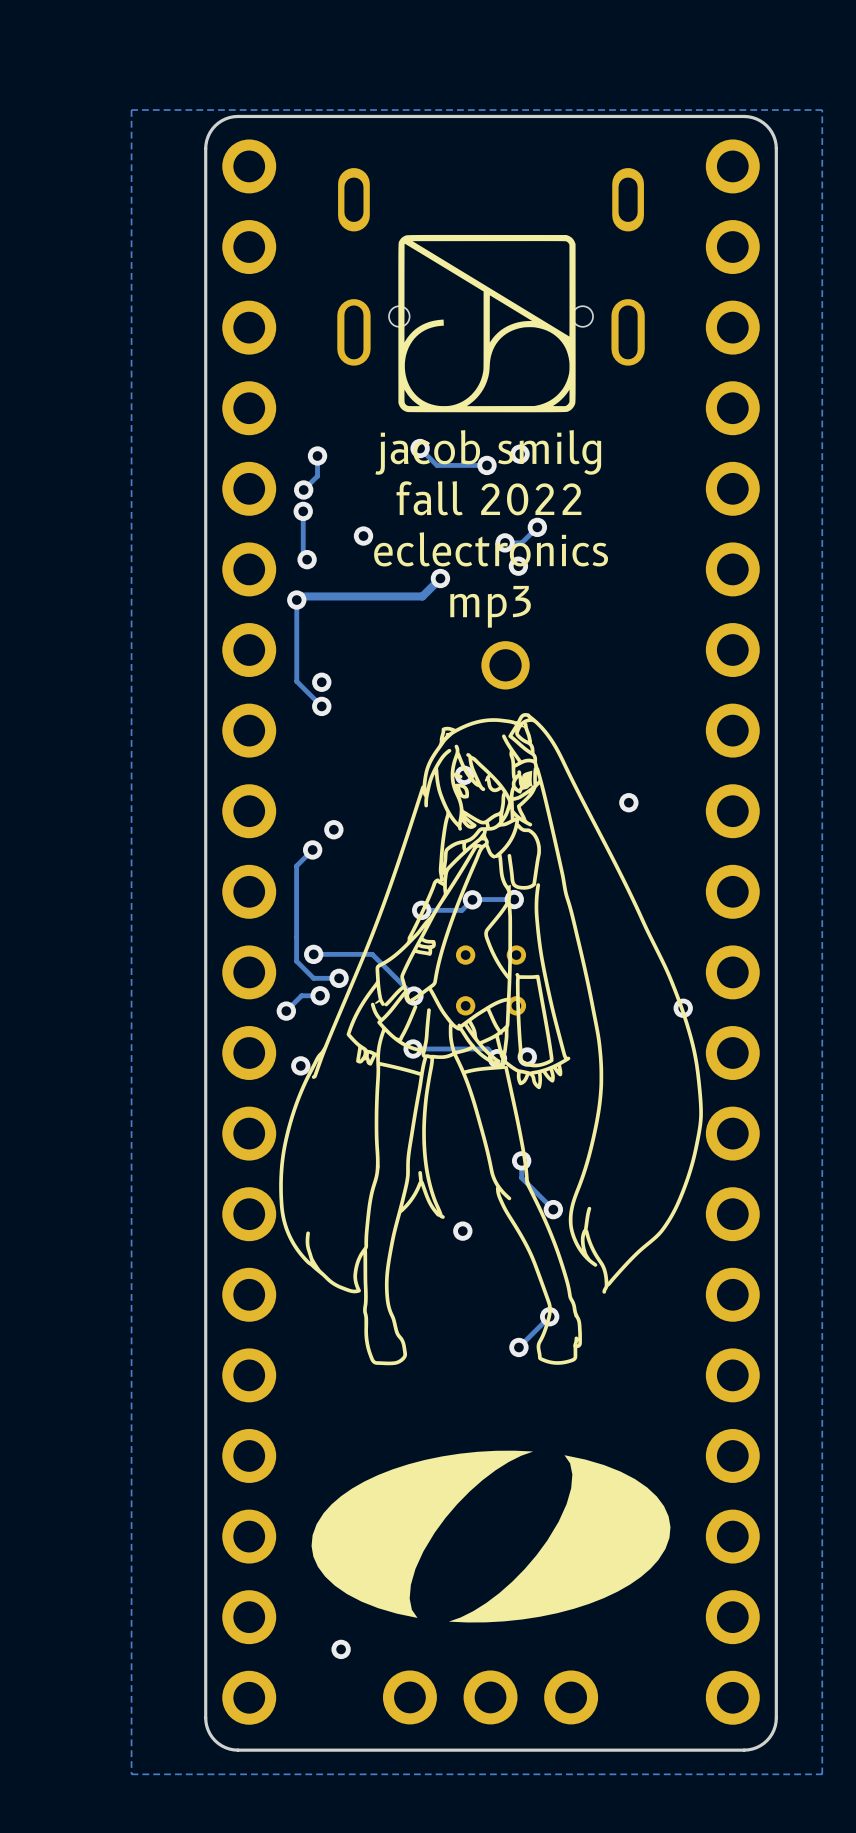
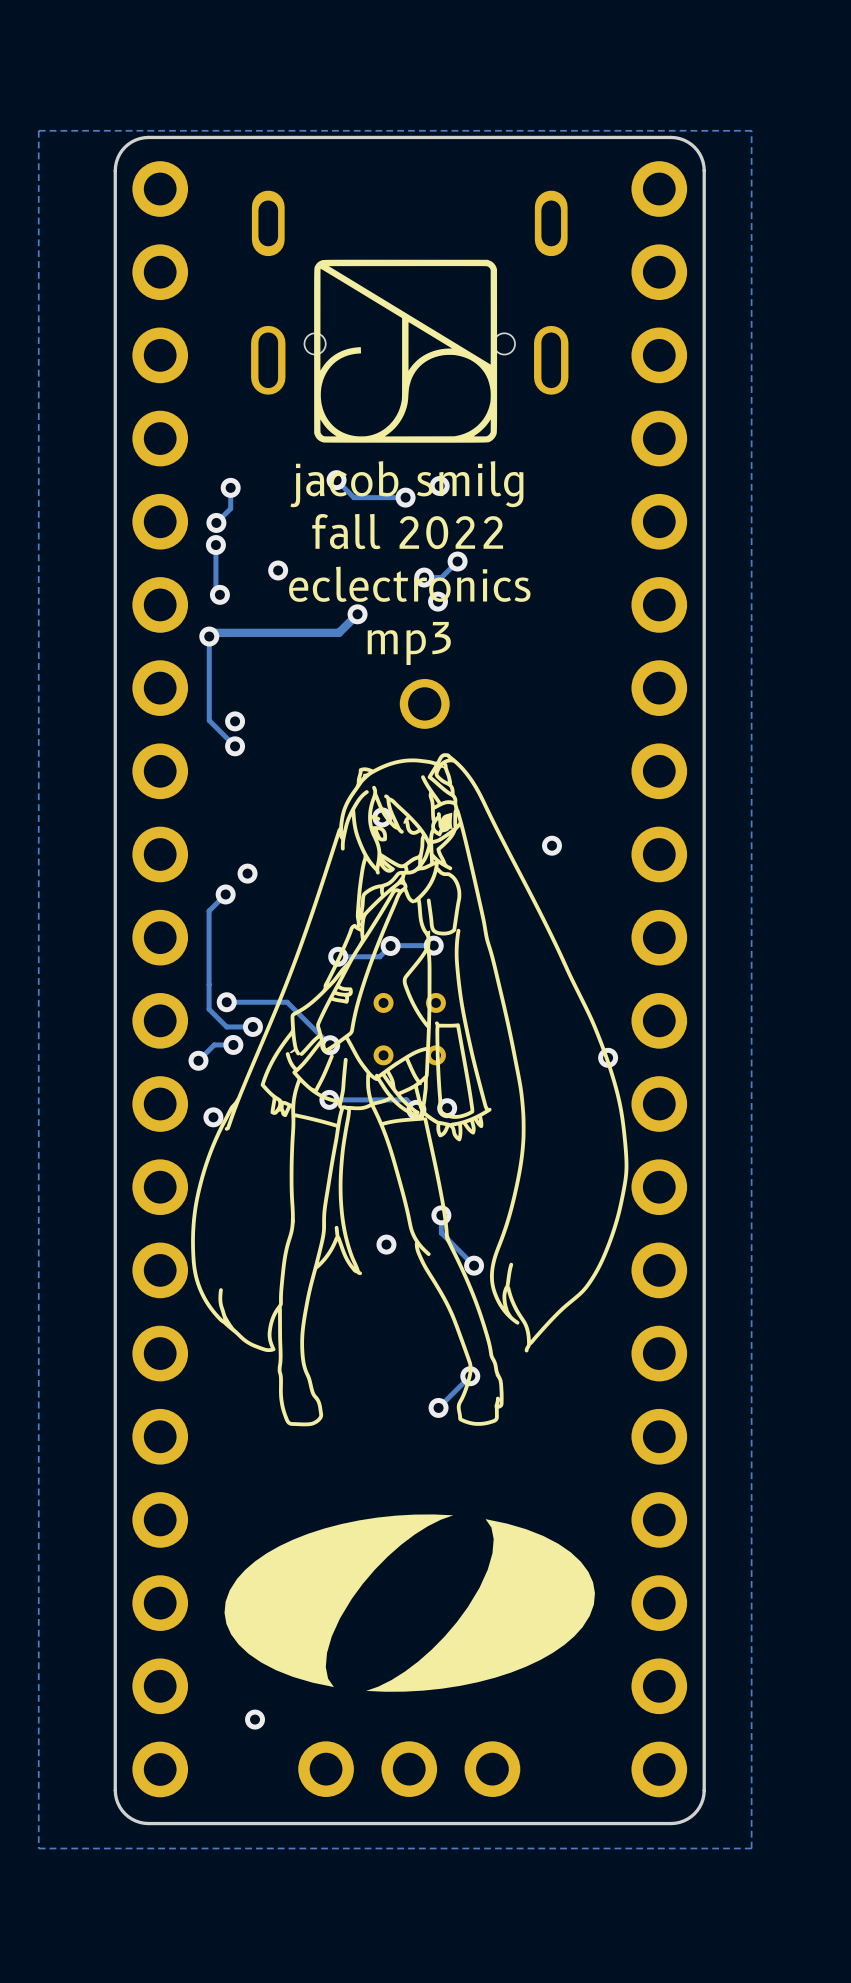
via position: (462, 1231) -> (386, 1244)

